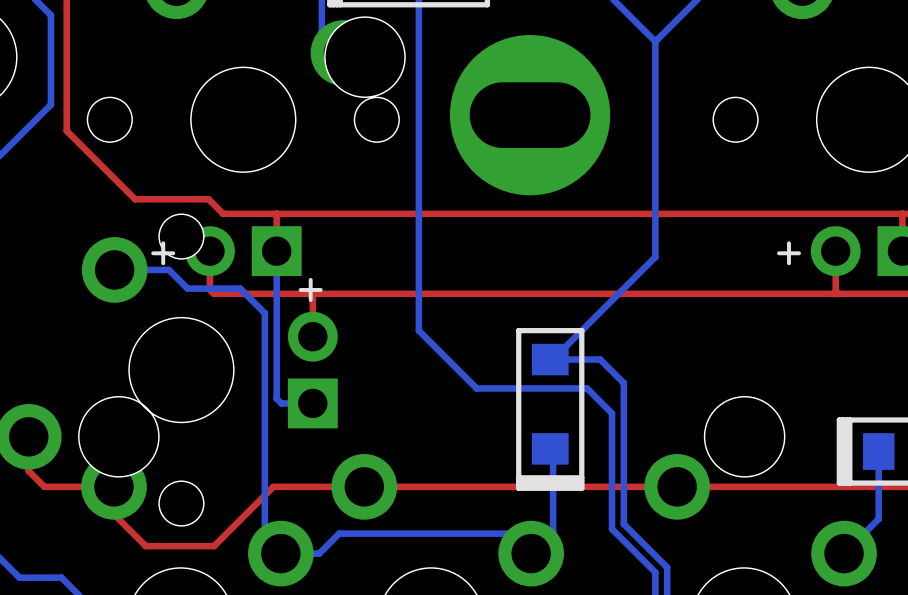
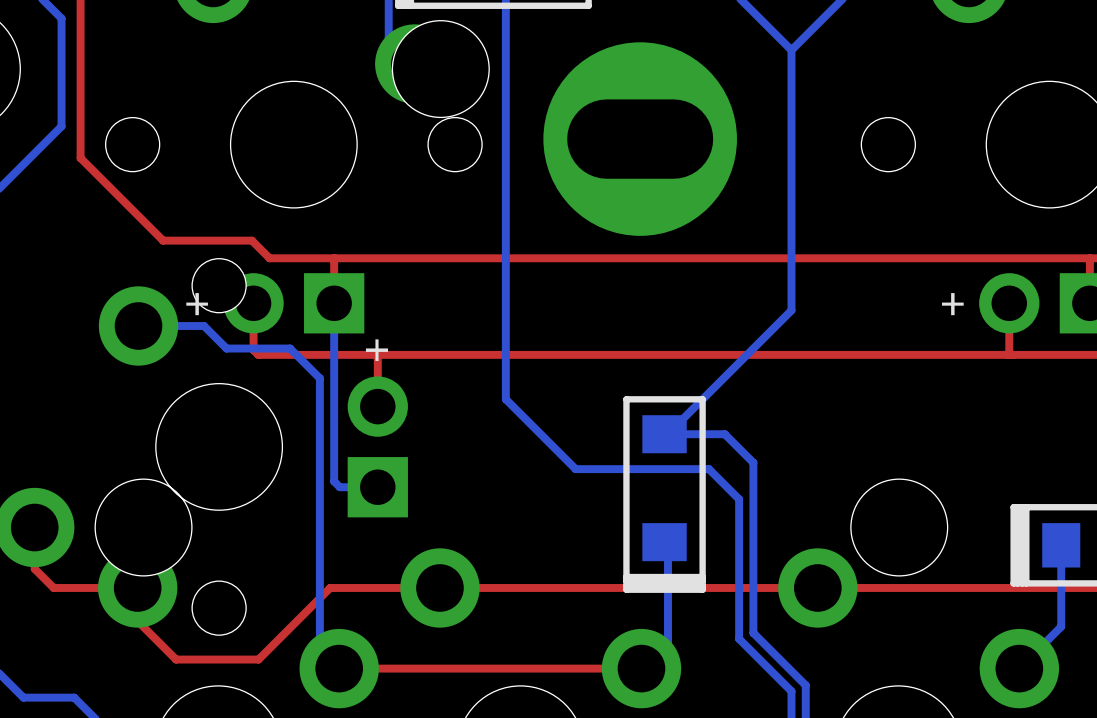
top track: none -> (641, 668) (339, 668)
bottom track: (531, 553) (511, 533) (339, 533) (319, 553) (280, 553) -> none

